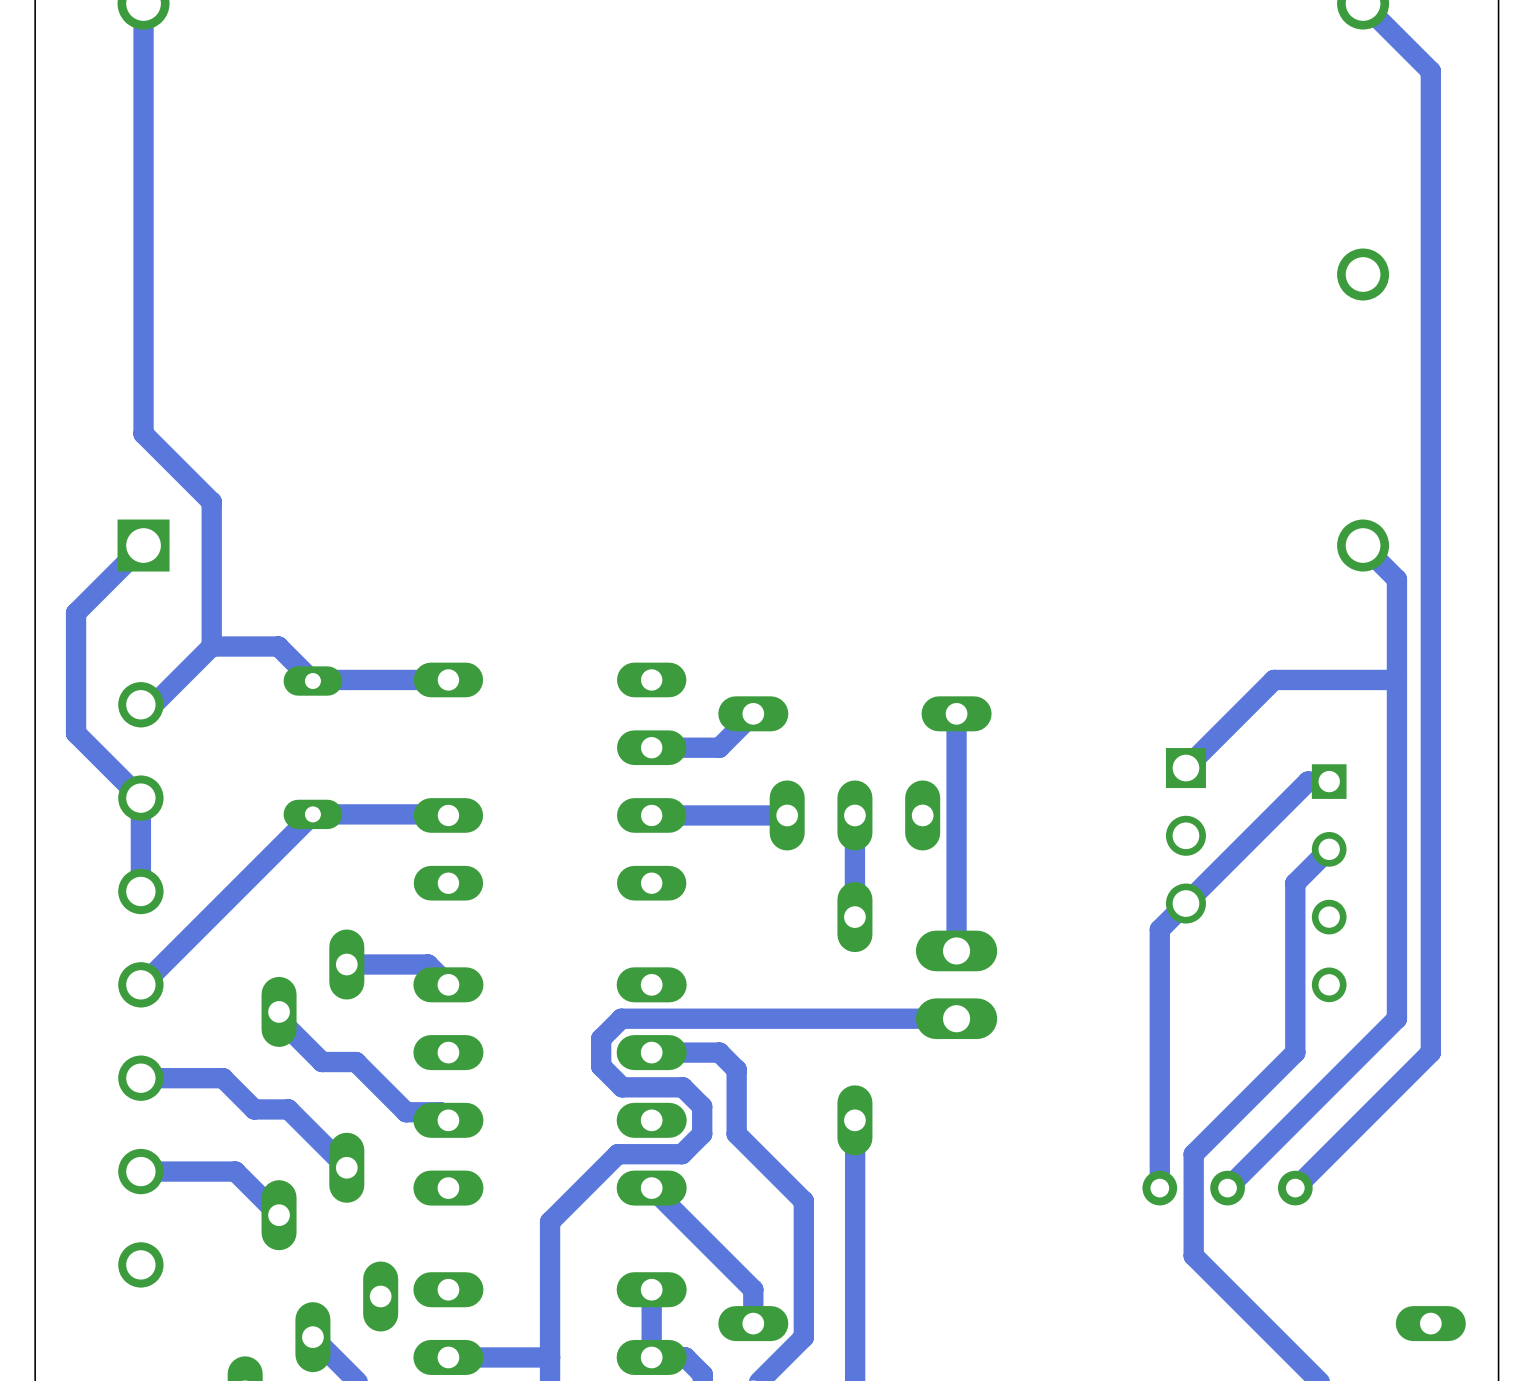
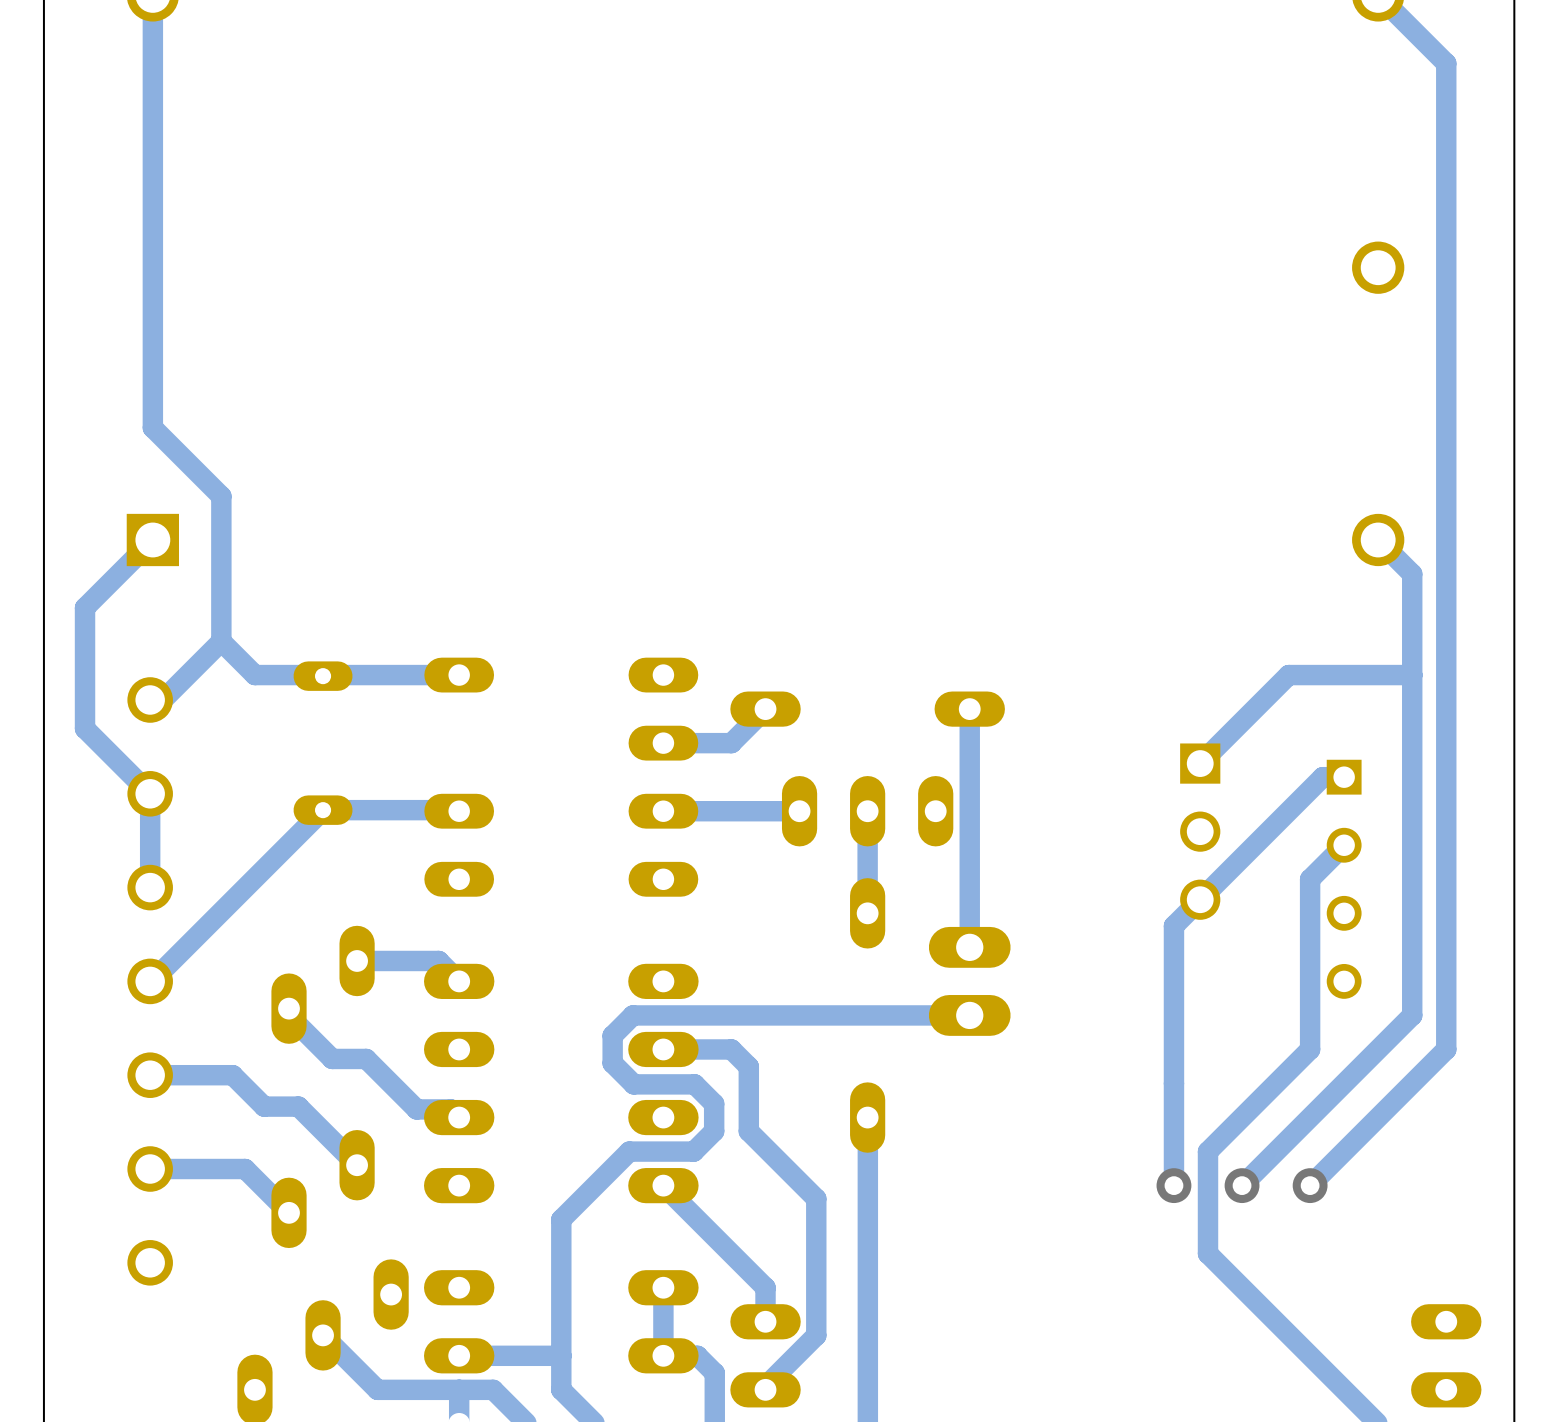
track: (211, 646) (278, 646) (311, 679) -> (221, 641) (254, 675) (321, 675)

